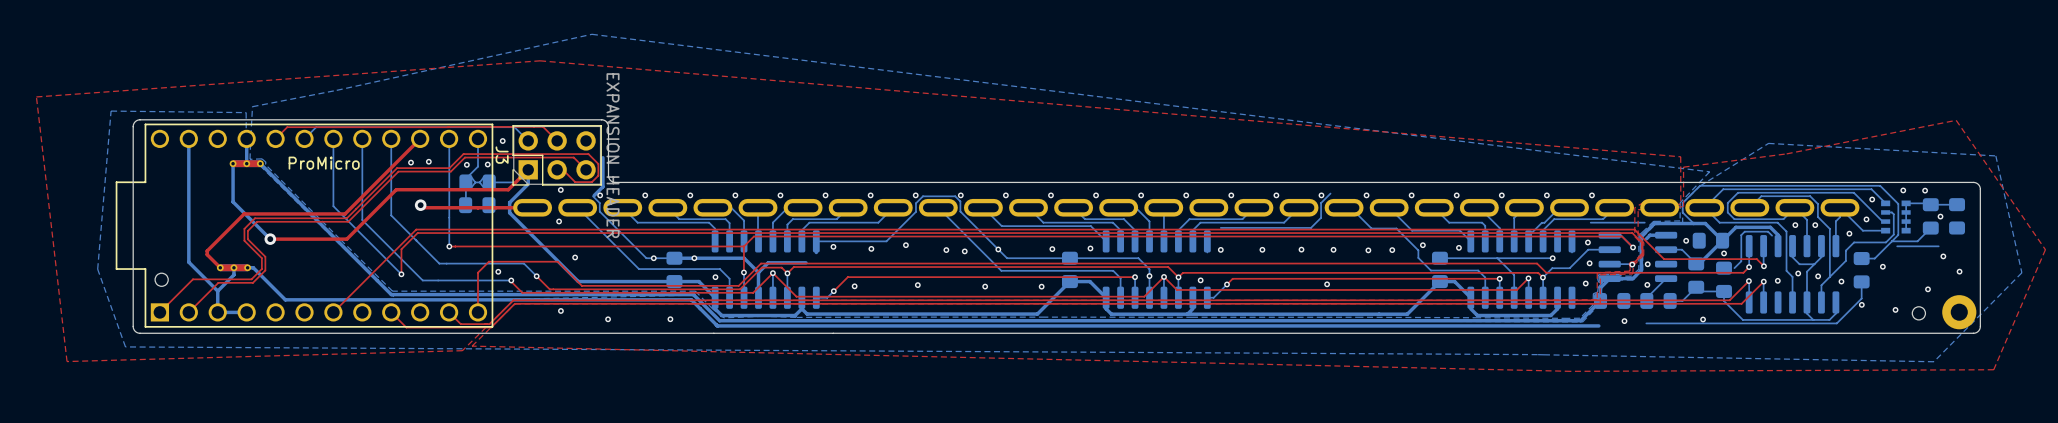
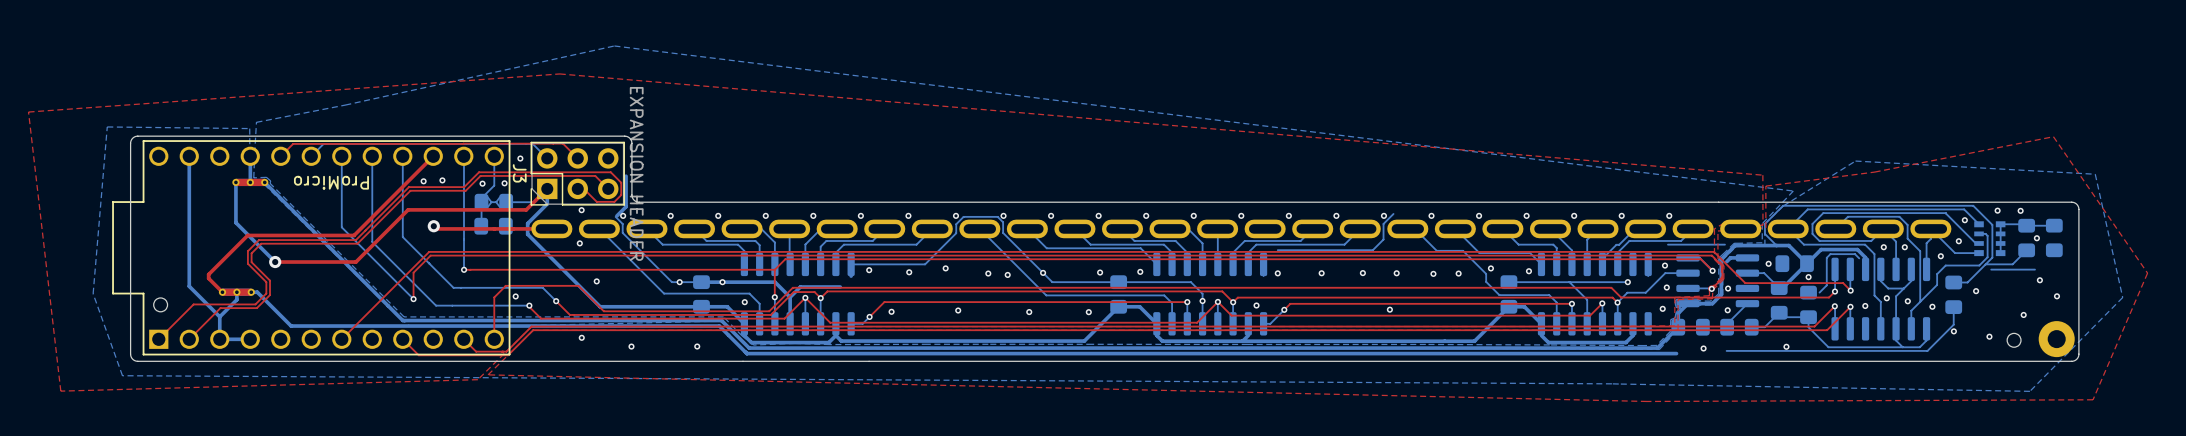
part value rotation: 0° (324, 163) -> 180° (331, 182)

